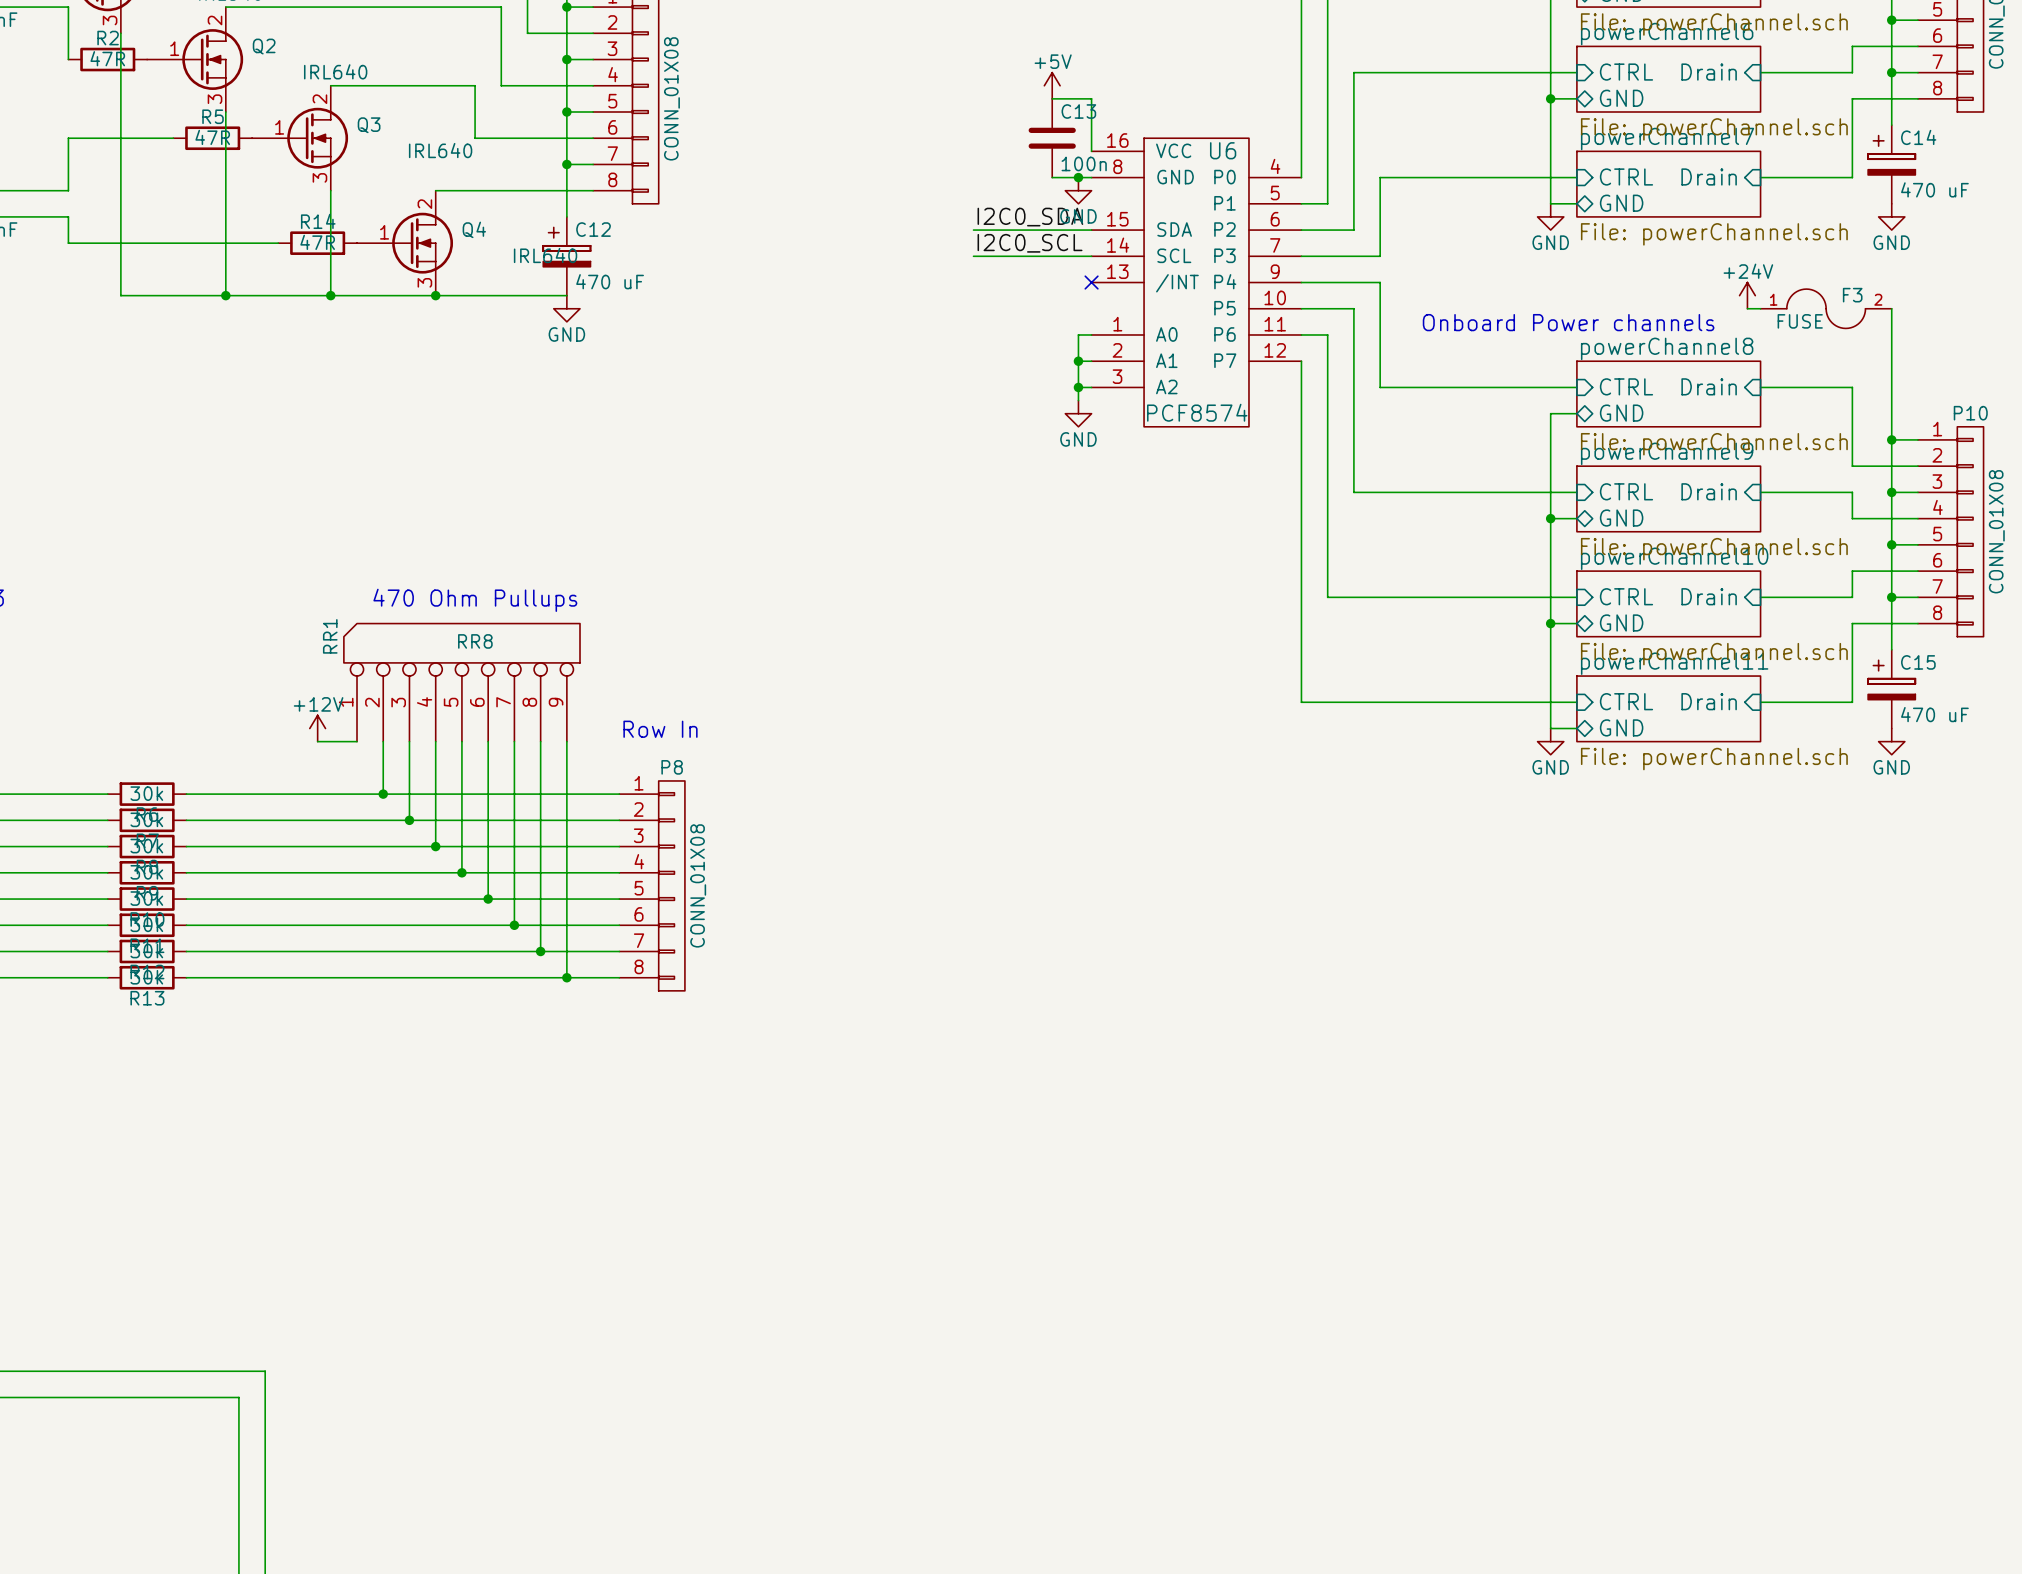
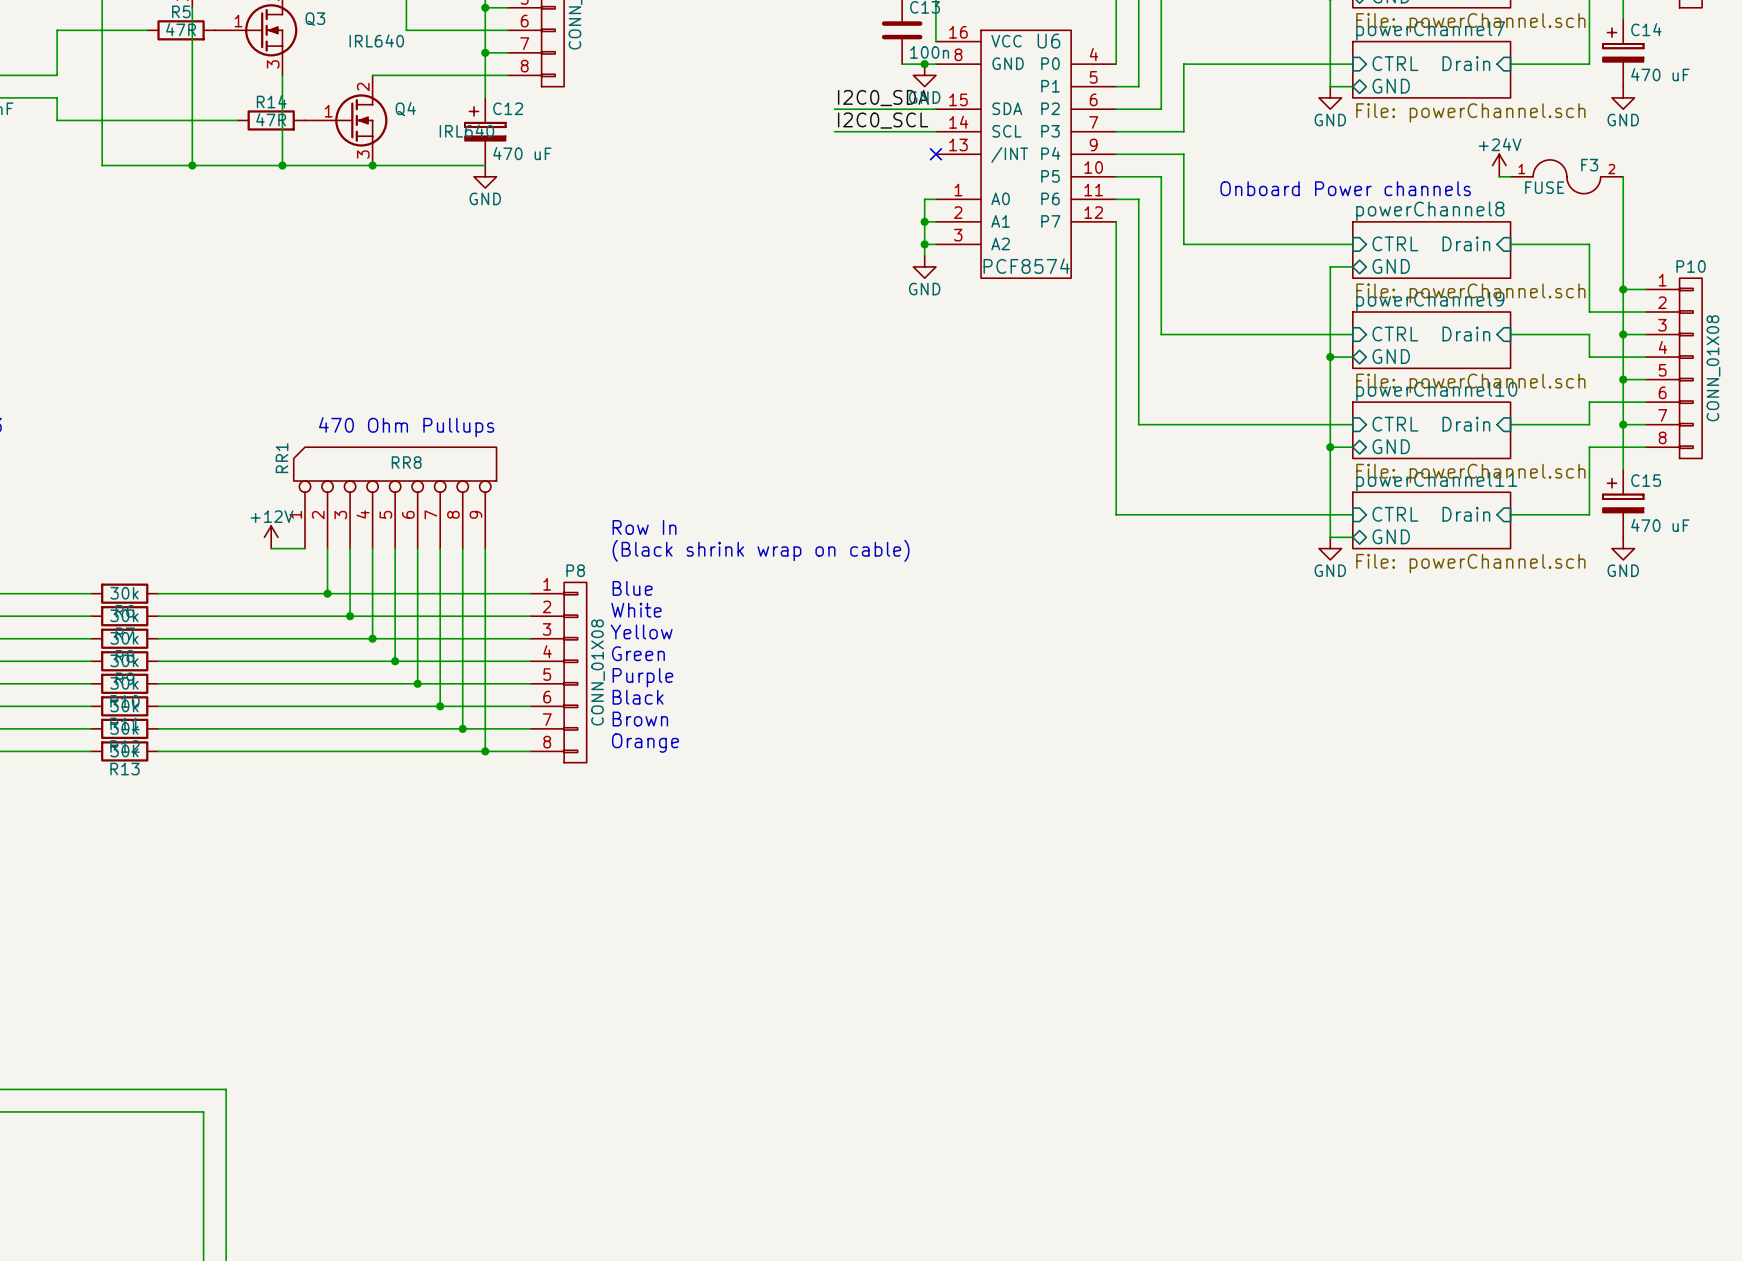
text position: Row In (660, 729) -> Row In (644, 527)
text: none -> (Black shrink wrap on cable) (761, 550)
text: none -> Blue (632, 588)
text: none -> White (636, 610)
text: none -> Yellow (641, 631)
text: none -> Green (638, 653)
text: none -> Purple (642, 677)
text: none -> Black (638, 697)
text: none -> Brown (640, 719)
text: none -> Orange (645, 743)

